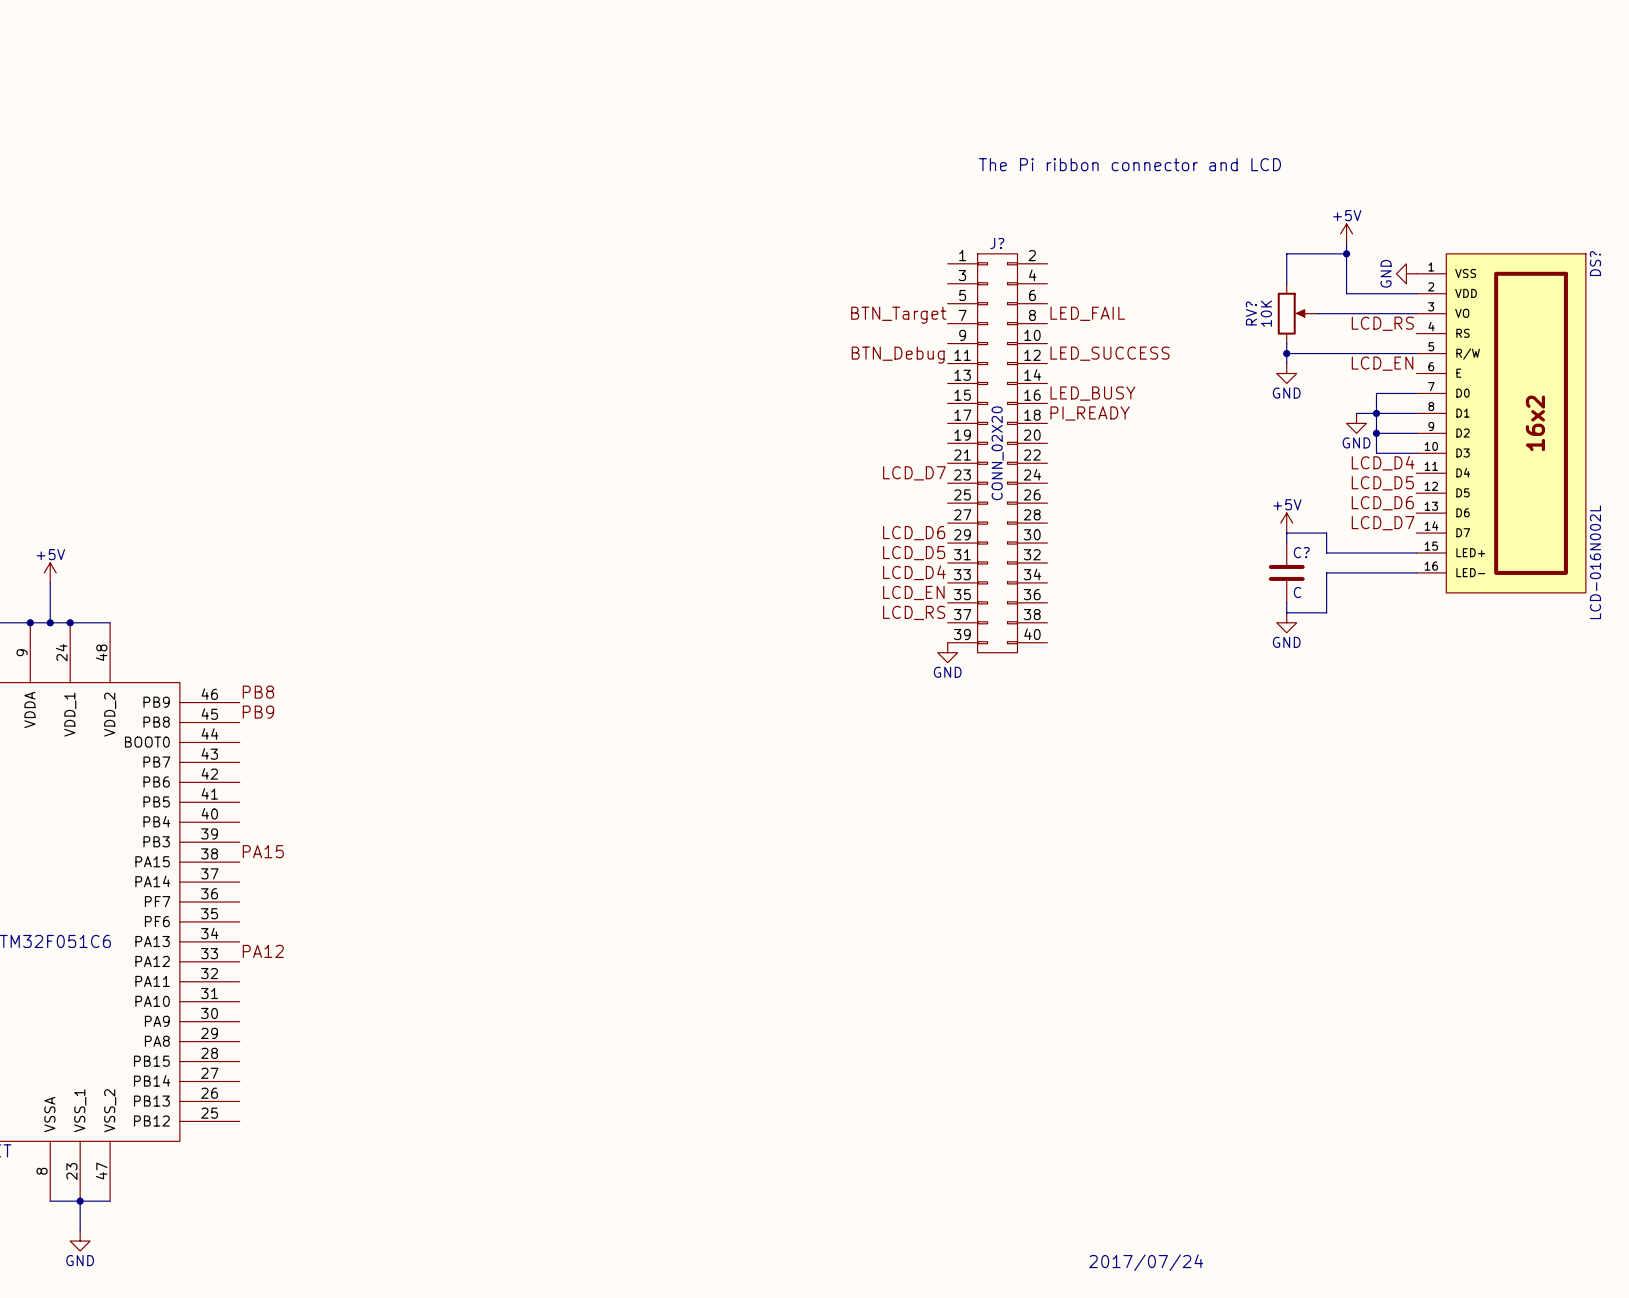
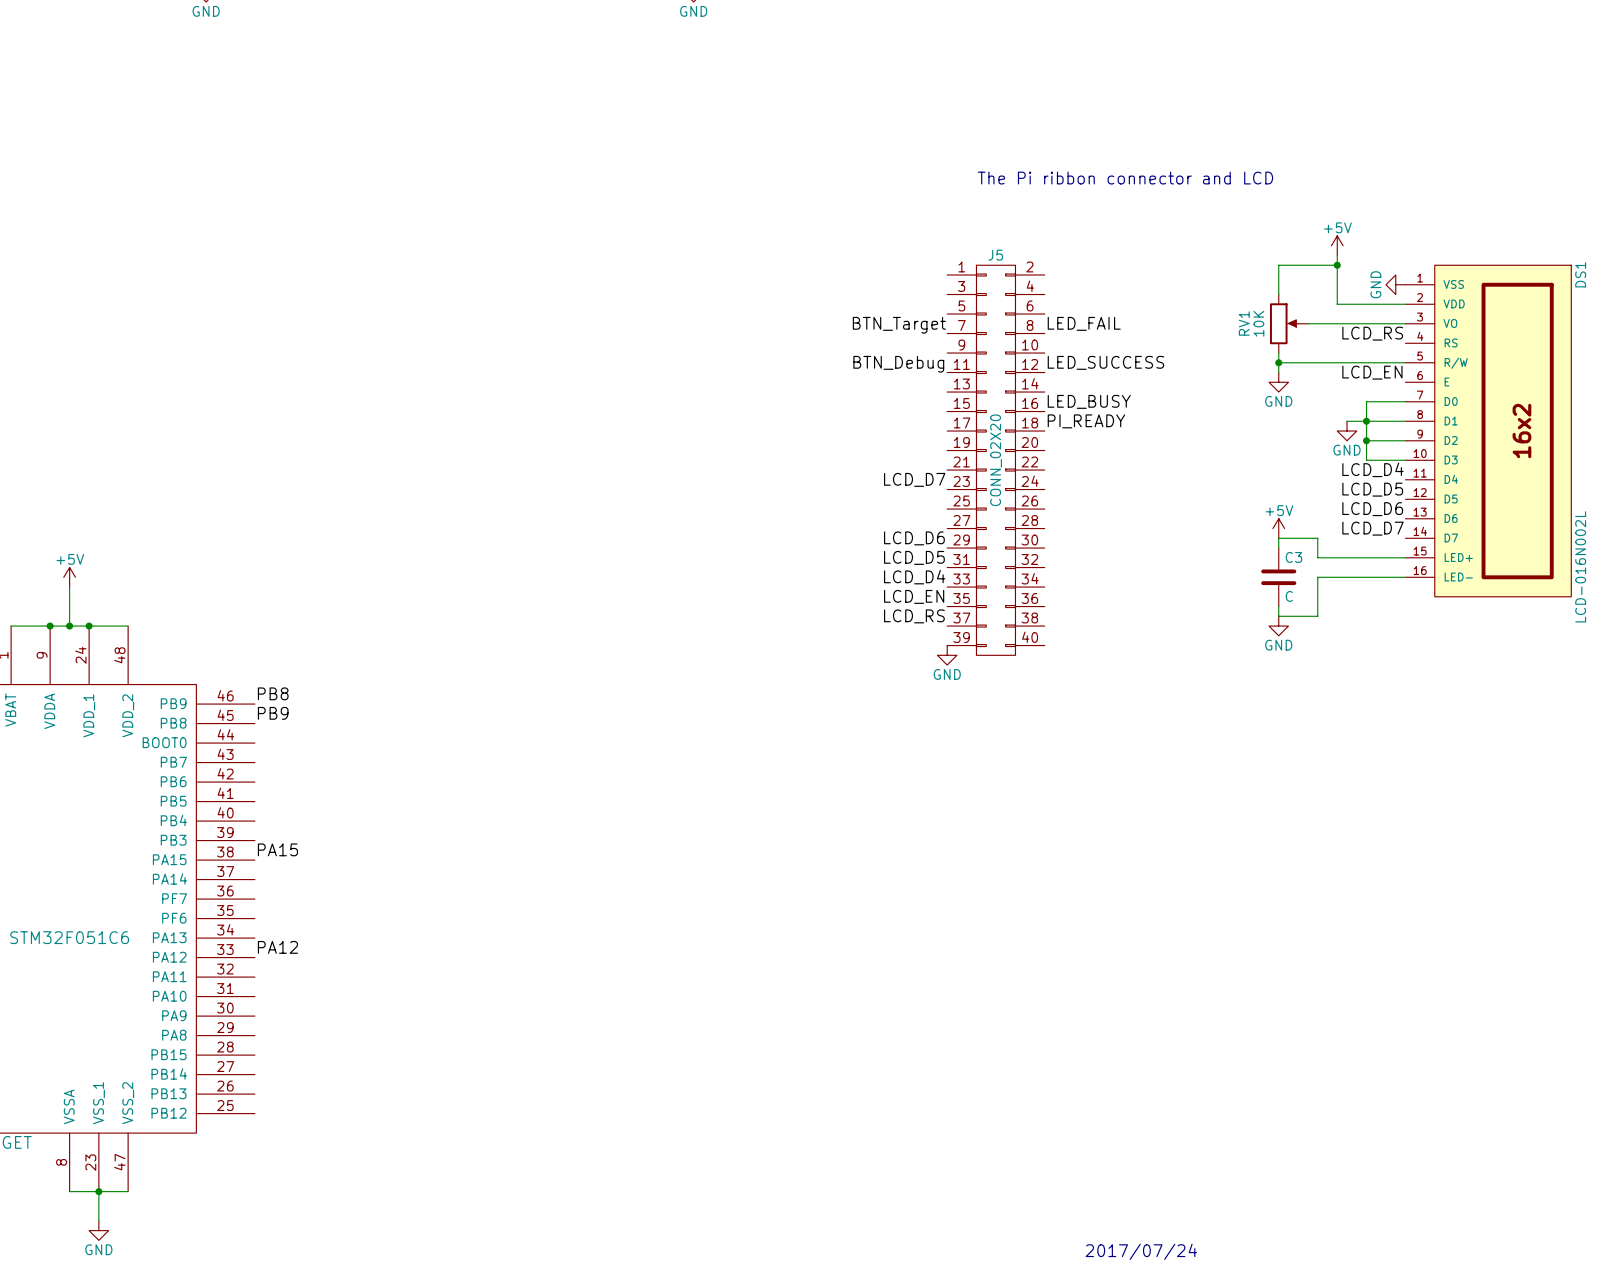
J? name: J? (997, 243) -> J5 (995, 255)
DS? name: DS? (1595, 263) -> DS1 (1580, 274)
RV? name: RV? (1251, 313) -> RV1 (1244, 323)
C? name: C? (1301, 552) -> C3 (1293, 557)

